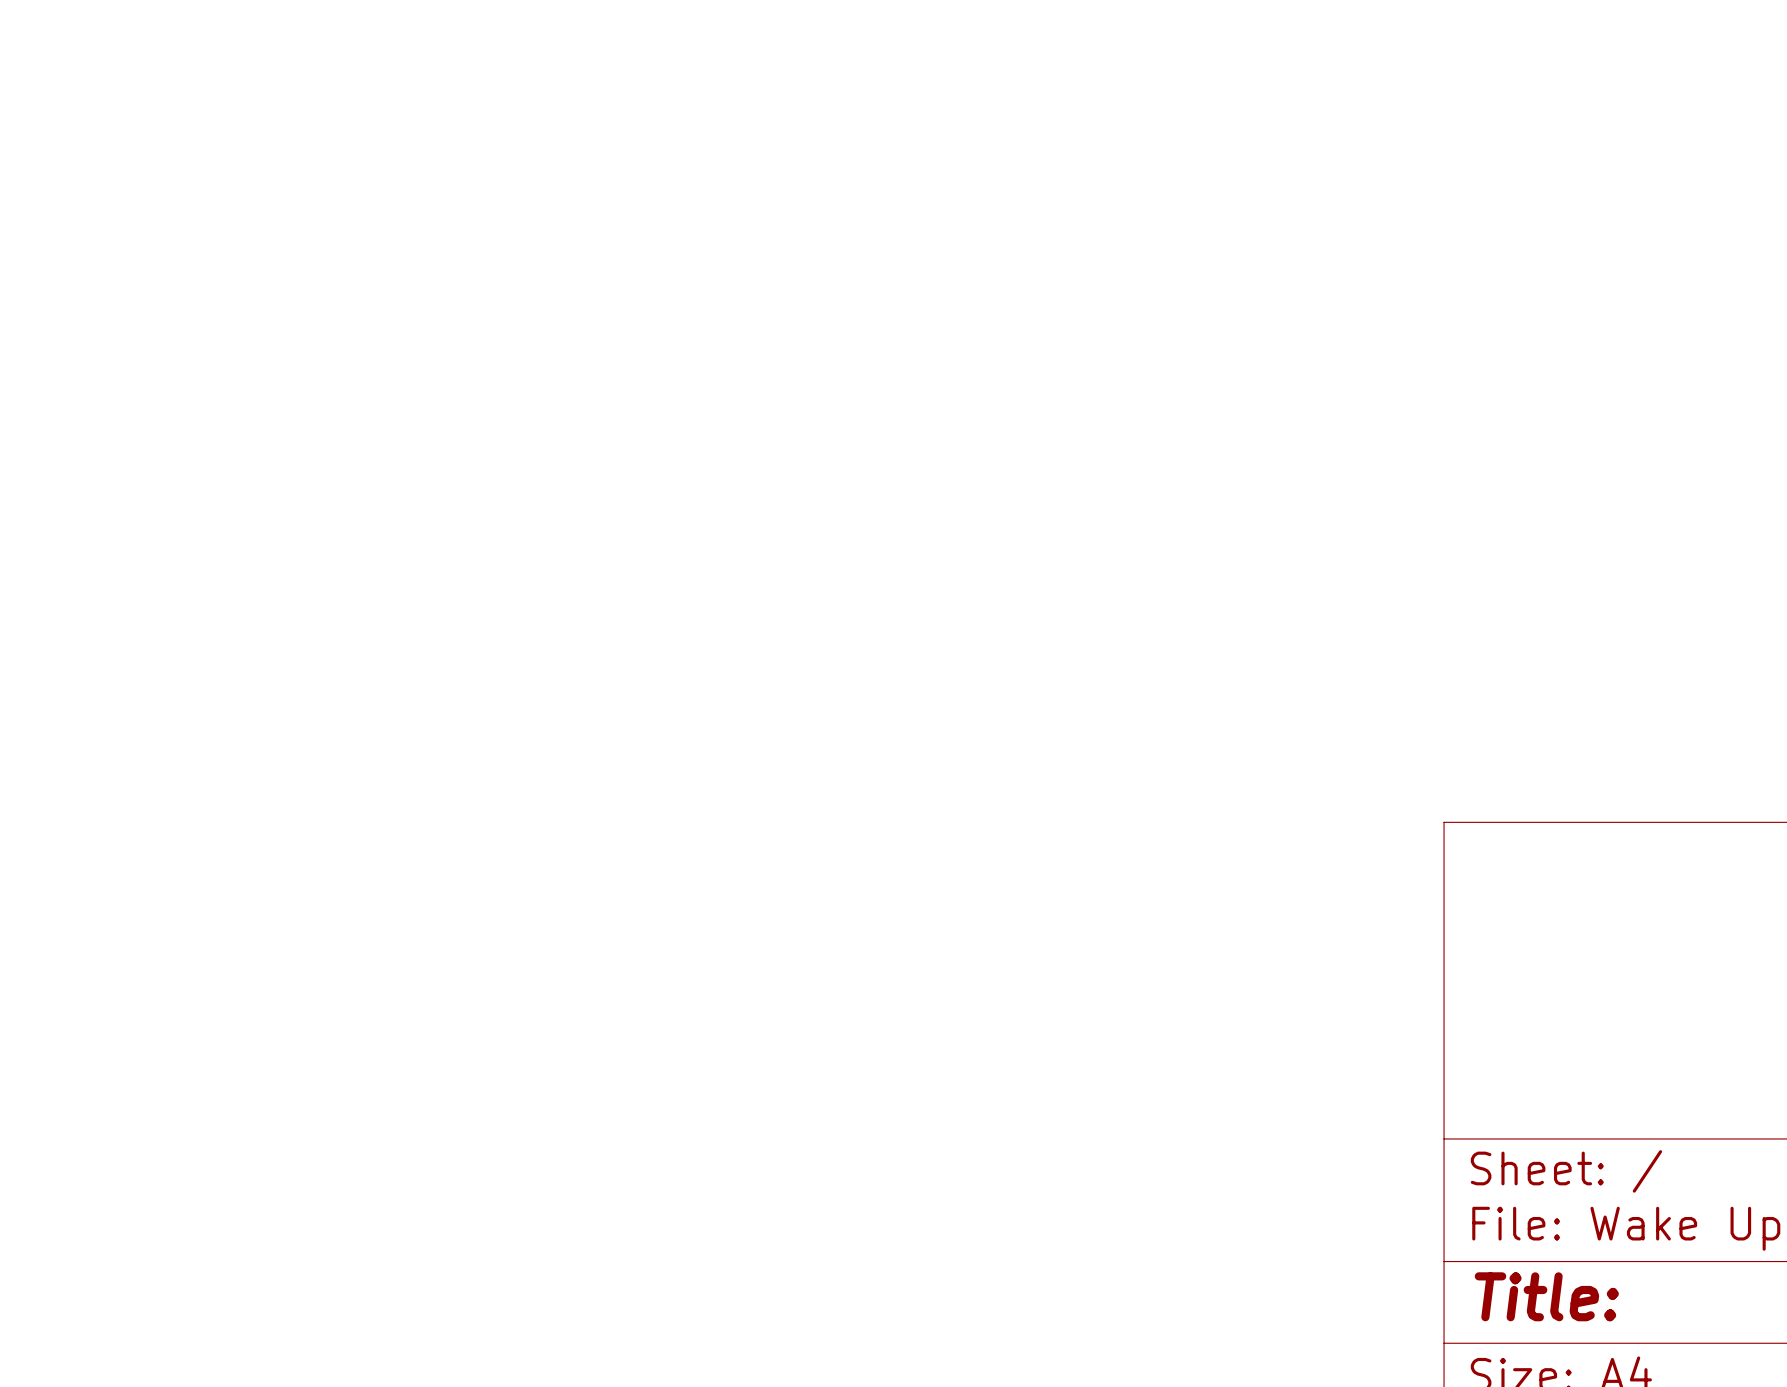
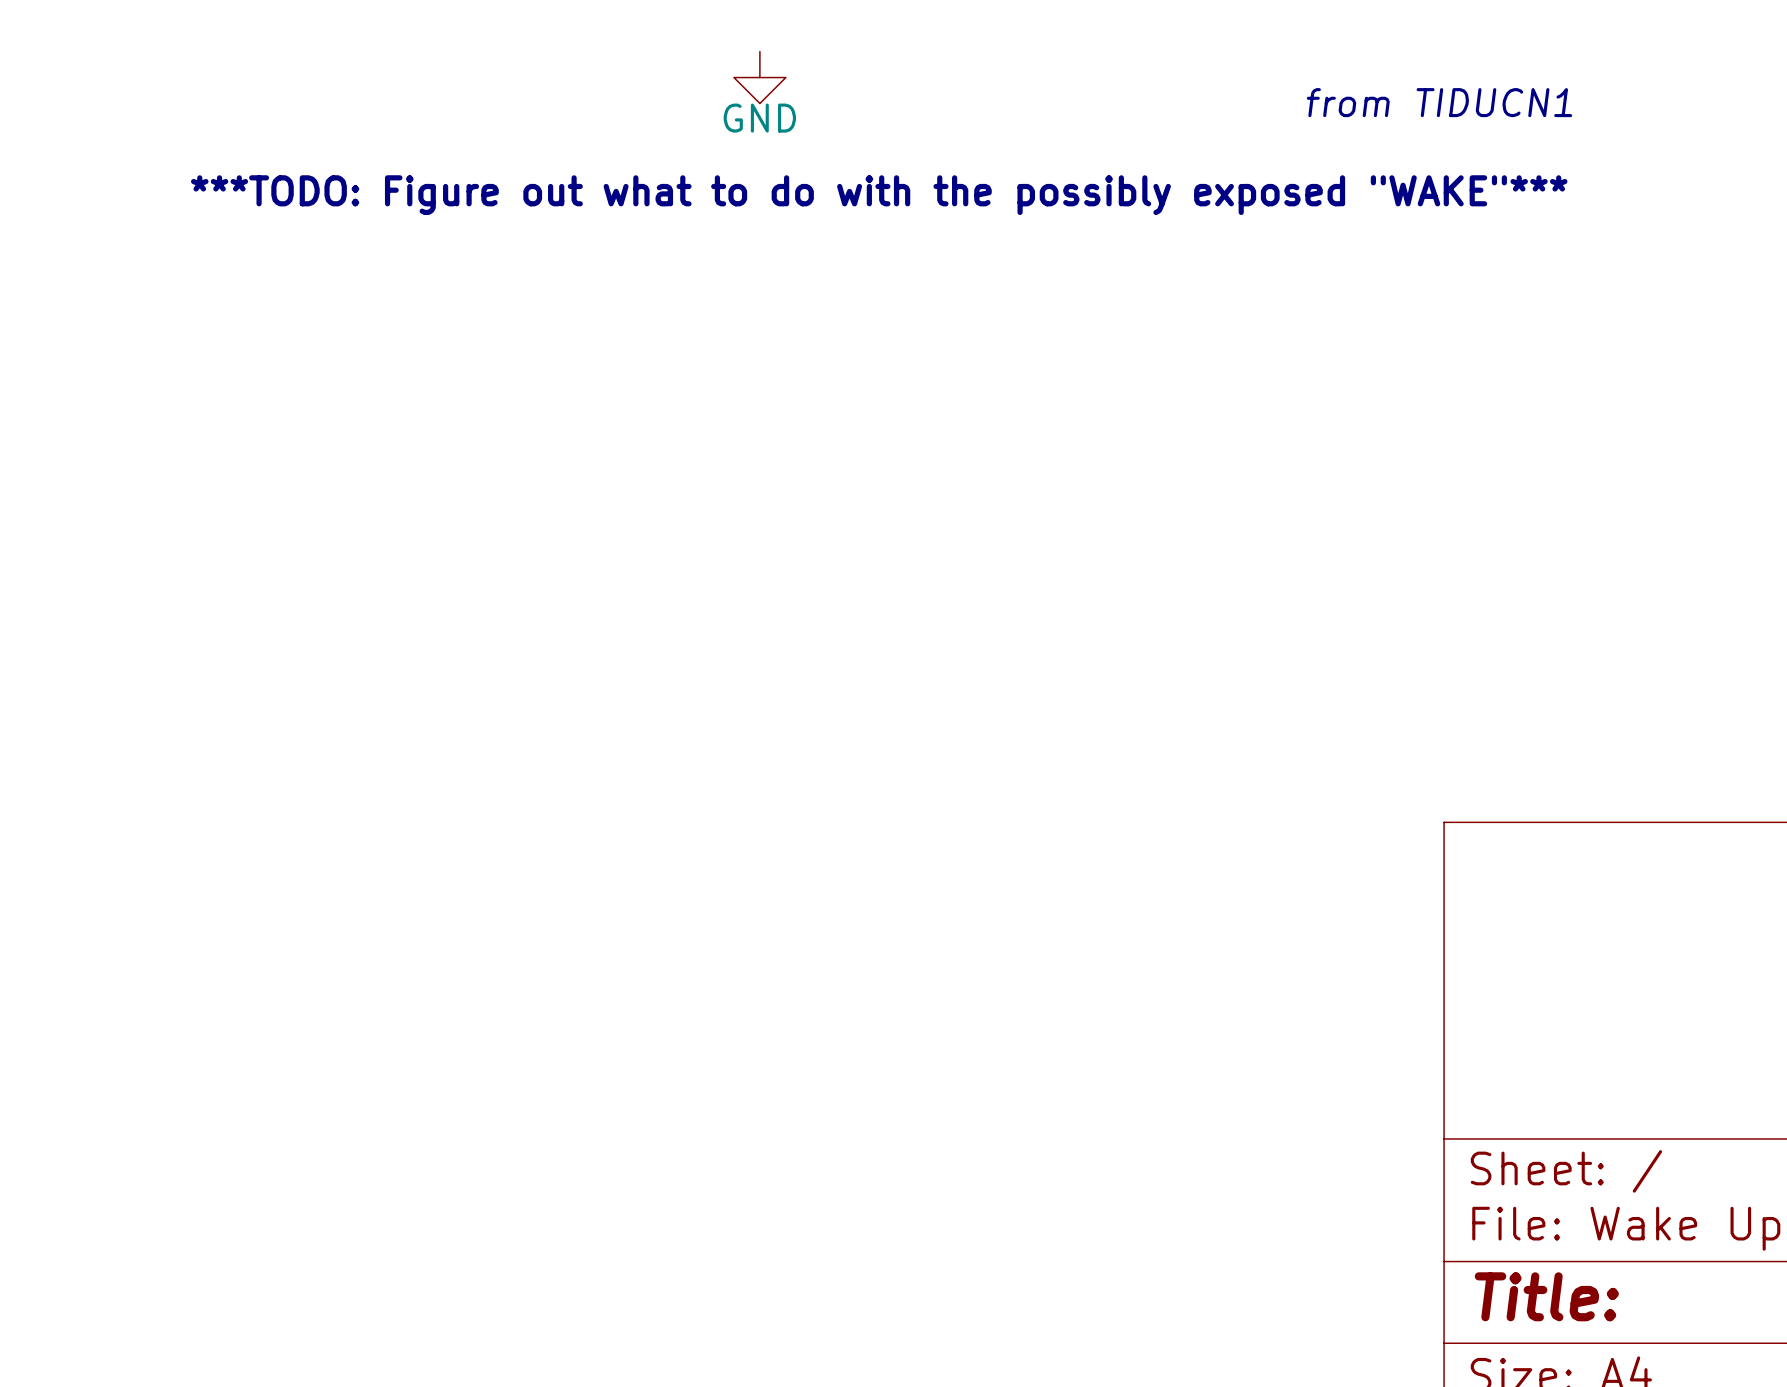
power symbol: none -> GND (759, 77)
text: none -> from TIDUCN1 (1439, 102)
text: none -> ***TODO: Figure out what to do with the possibly exposed "WAKE"*** (879, 195)

